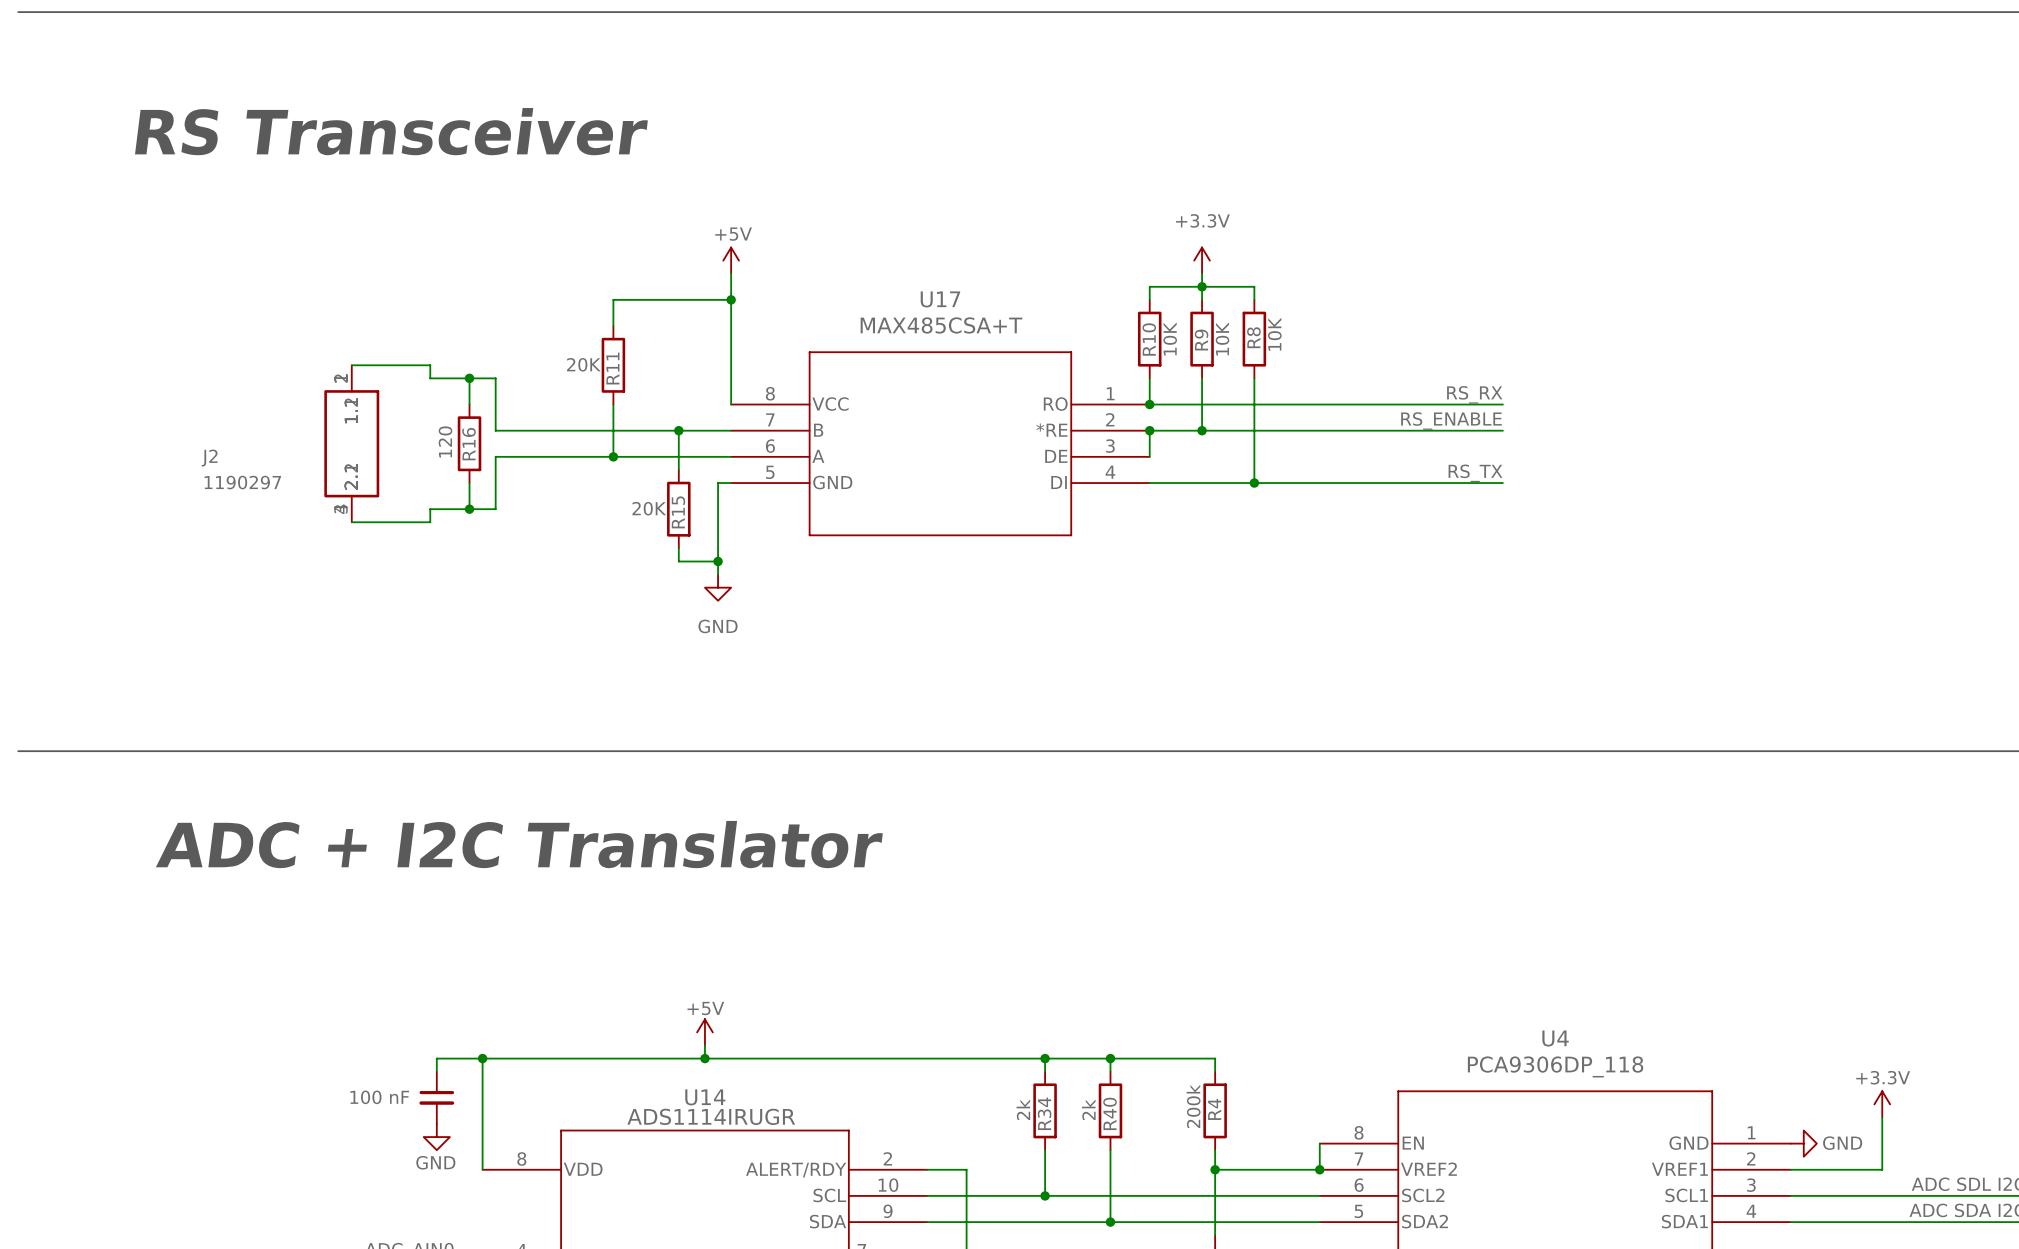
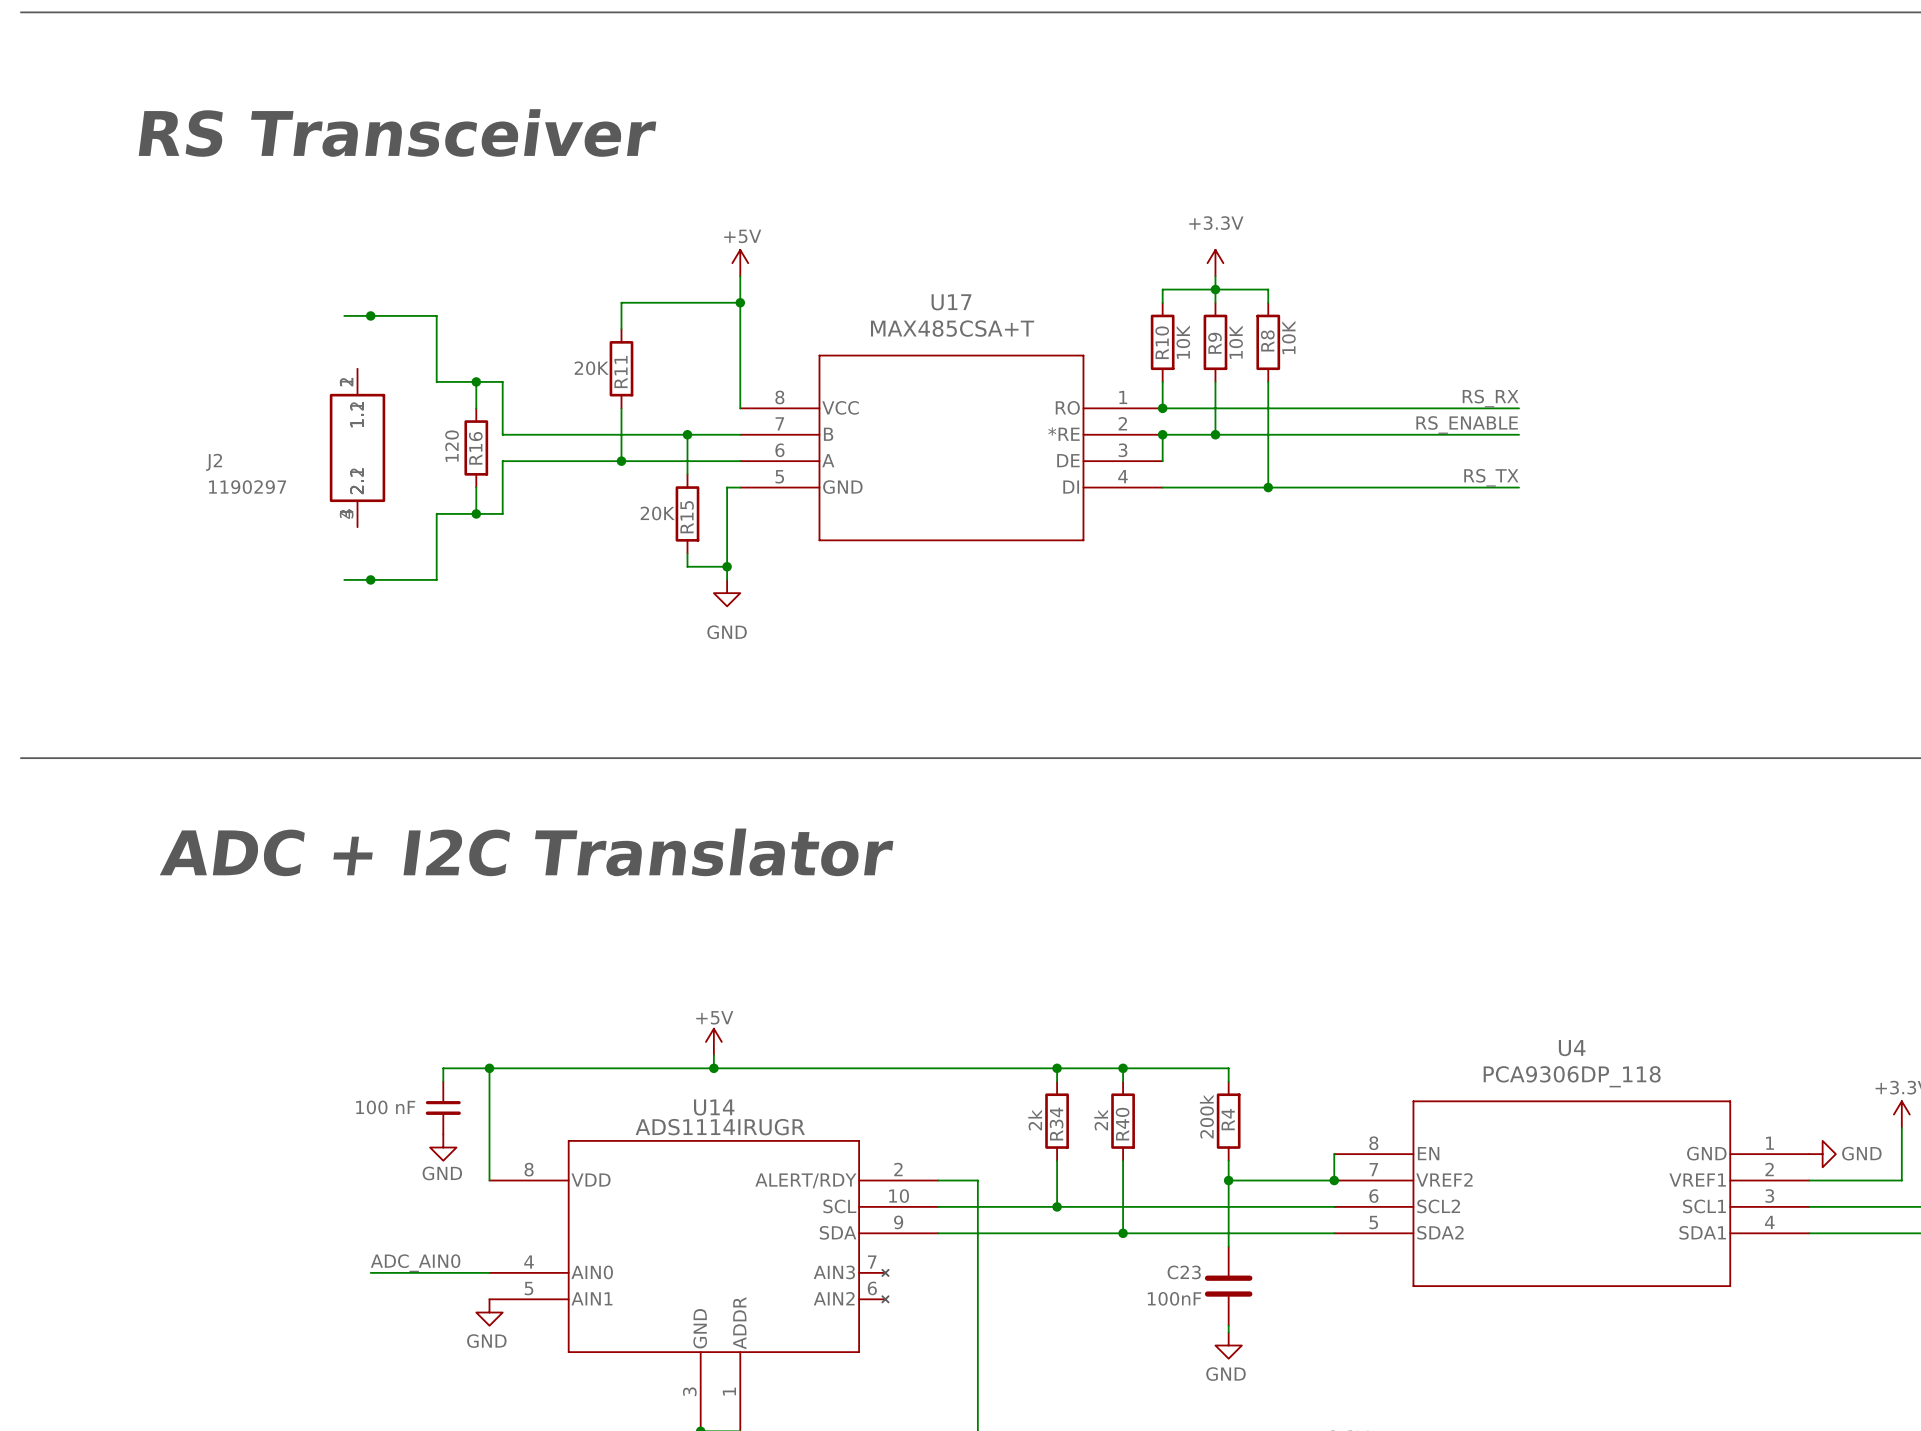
junction: none -> (370, 315)
wire: (351, 365) (430, 365) -> (344, 315) (436, 315) (436, 368)
wire: (351, 522) (430, 522) -> (344, 579) (436, 579) (436, 527)
junction: none -> (370, 579)

